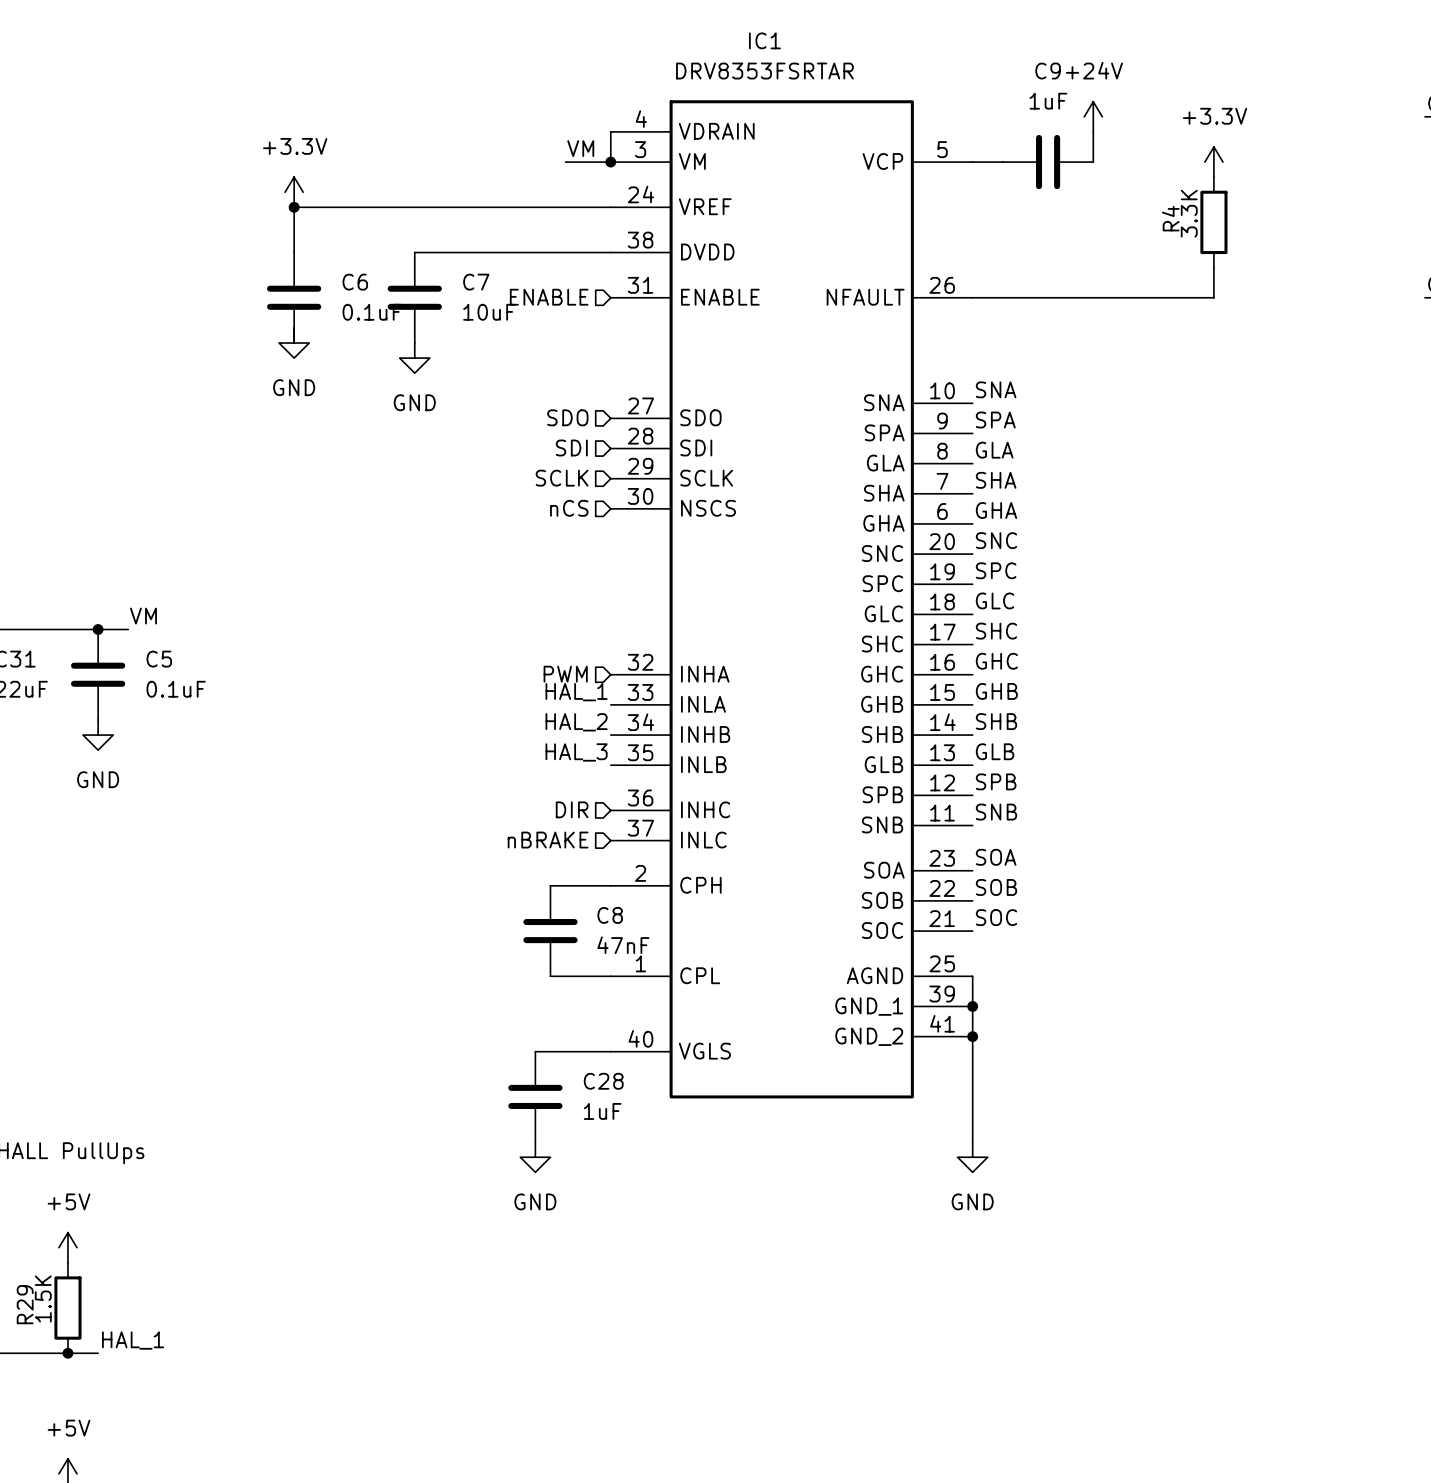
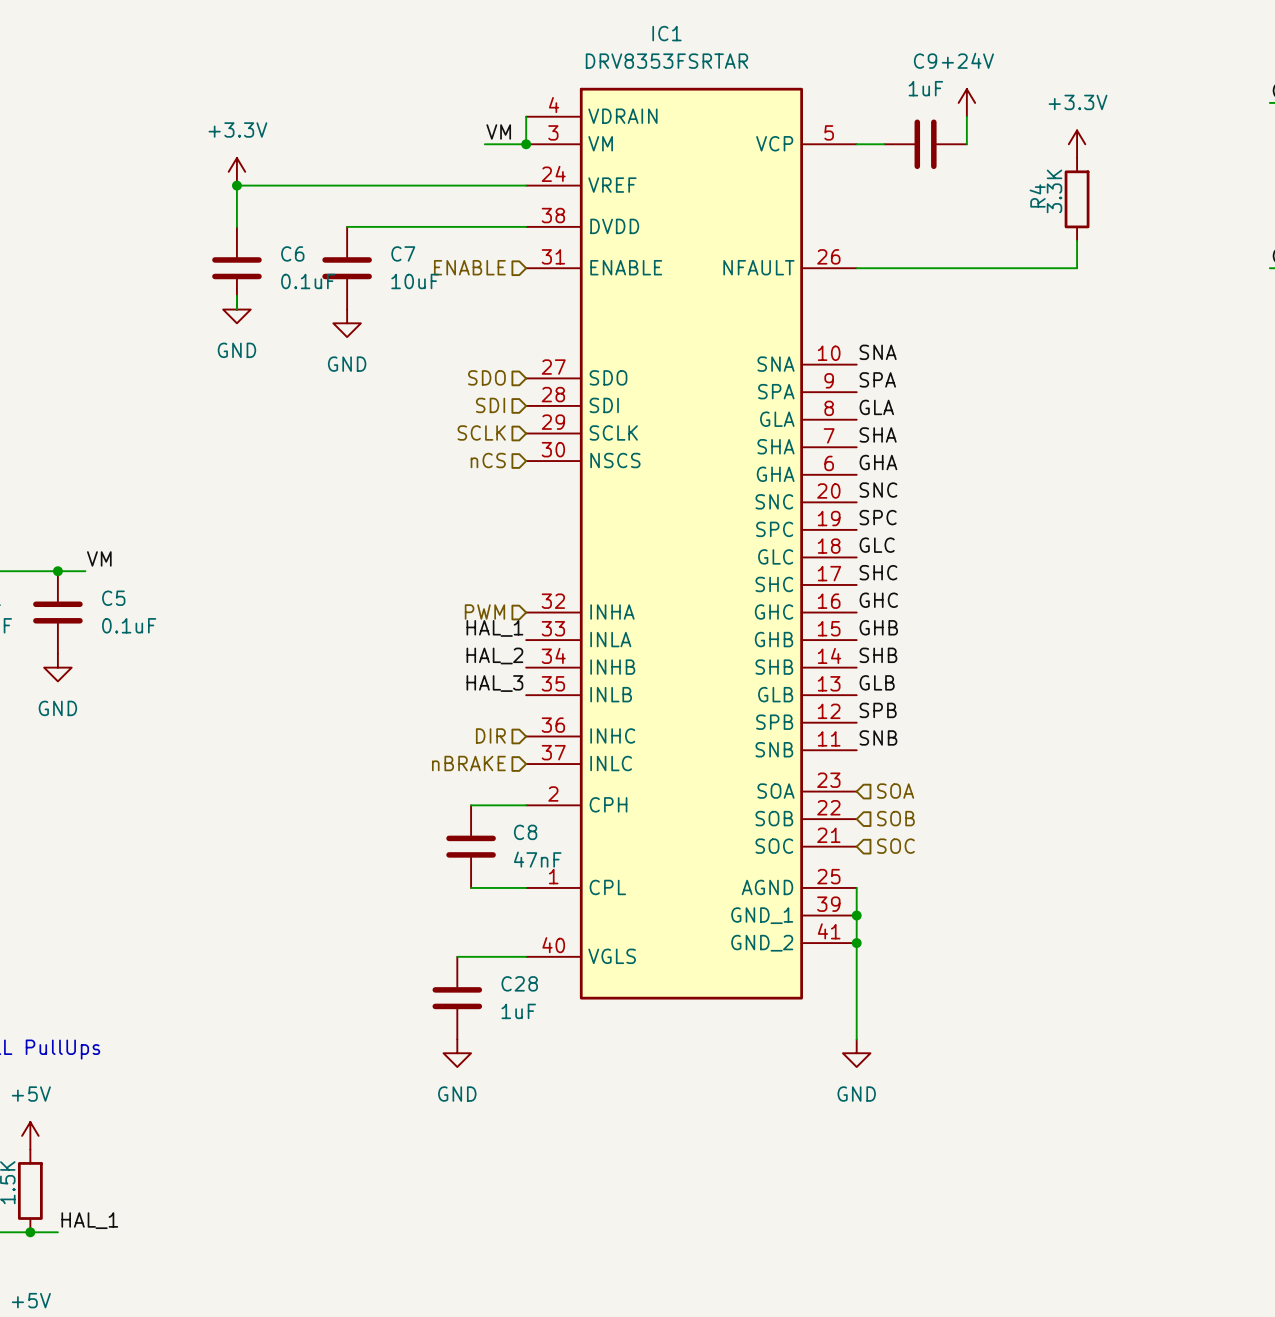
label: SOA (996, 857) -> none
hierarchical label: none -> SOA (895, 791)
label: SOB (996, 887) -> none
hierarchical label: none -> SOB (895, 818)
label: SOC (996, 917) -> none
hierarchical label: none -> SOC (895, 846)

